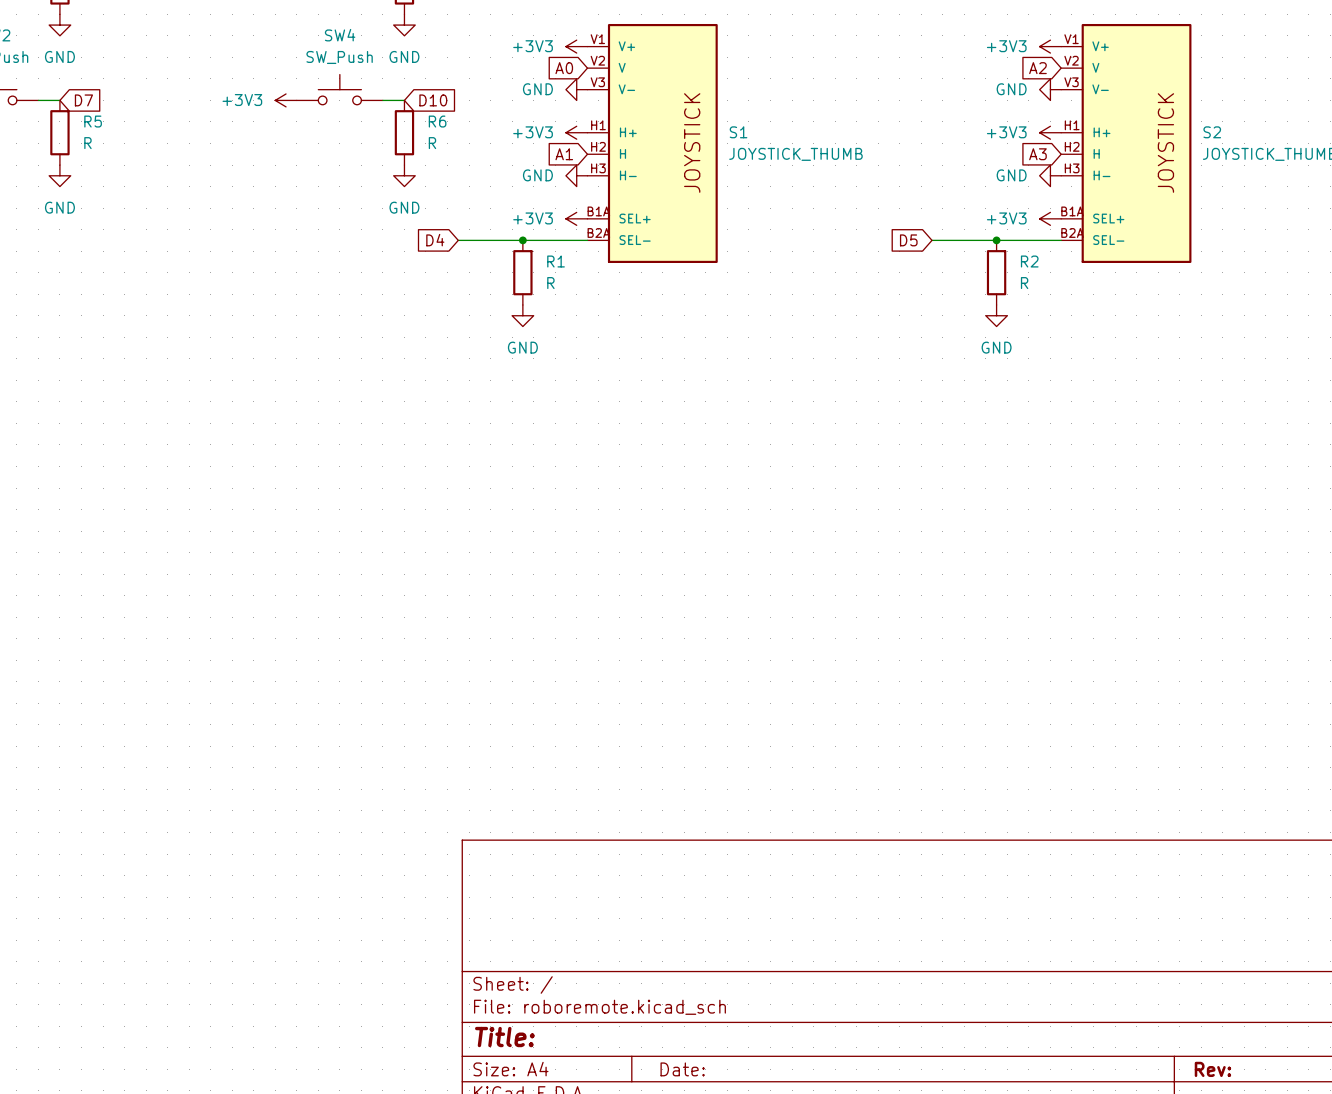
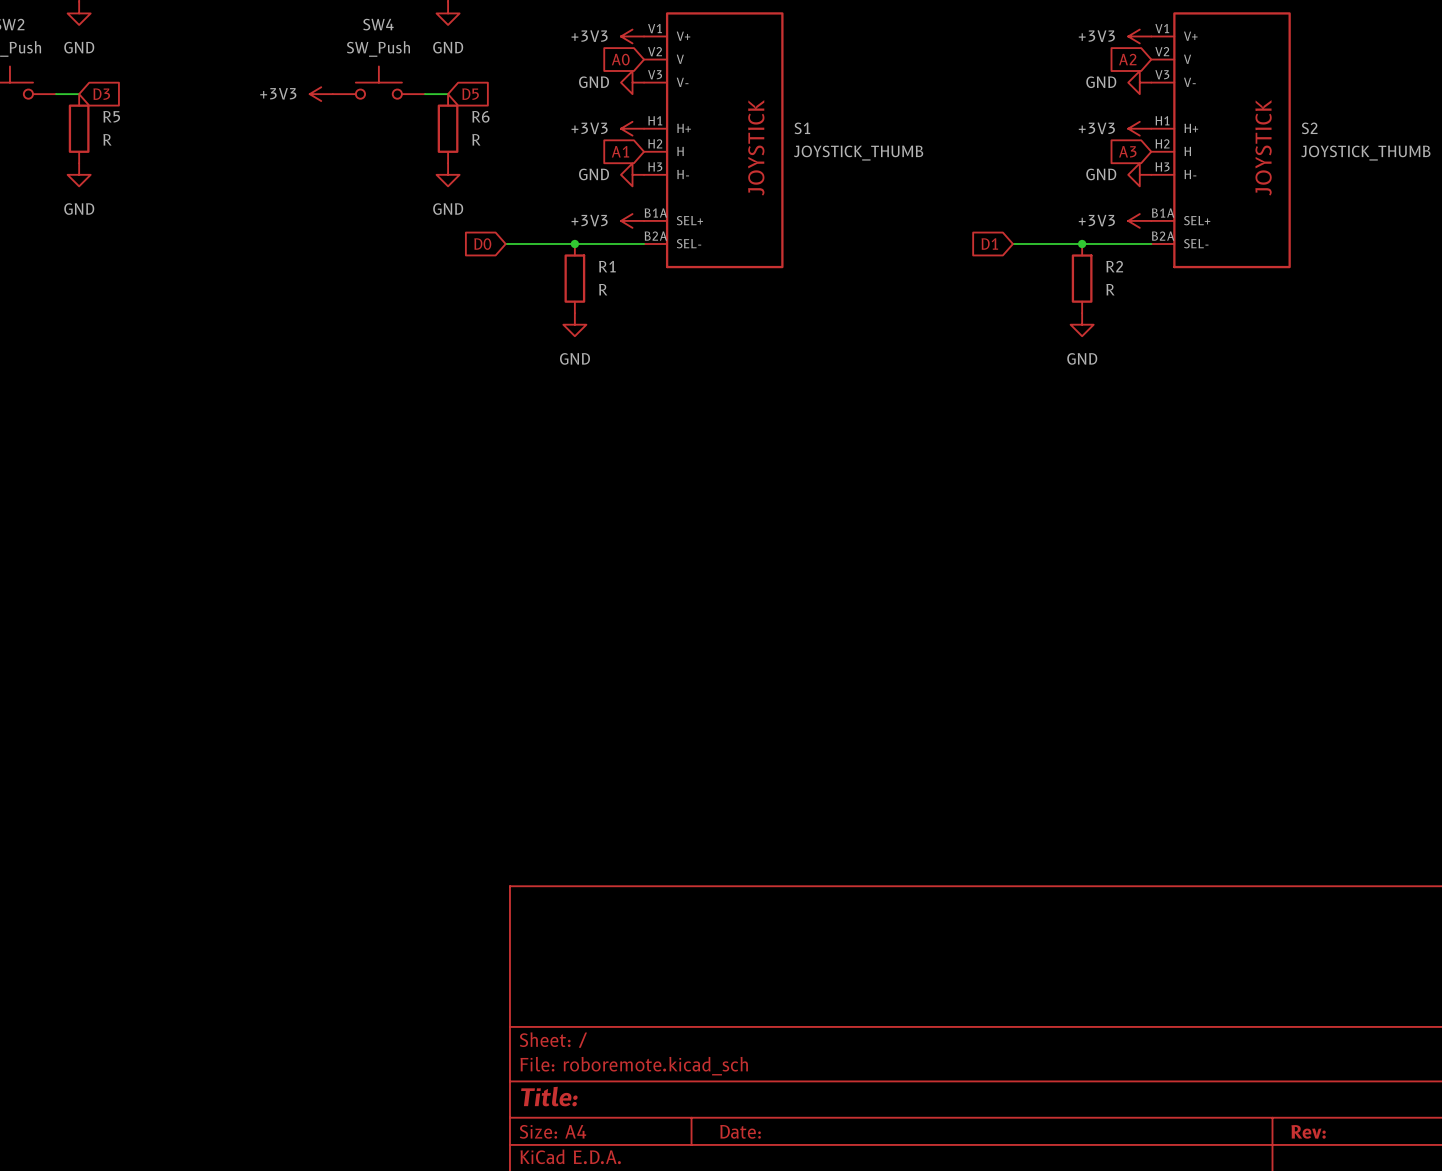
global label: D7 (83, 100) -> D3 (101, 94)
global label: D10 (433, 100) -> D5 (470, 94)
global label: D4 (435, 240) -> D0 (482, 244)
global label: D5 (908, 240) -> D1 (989, 244)

